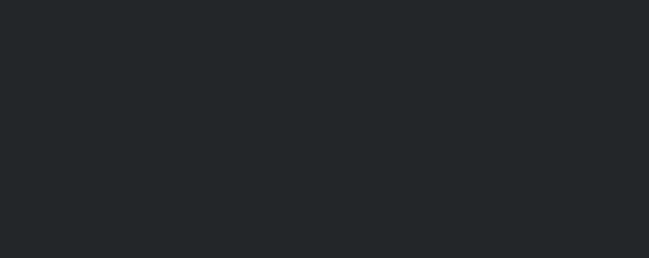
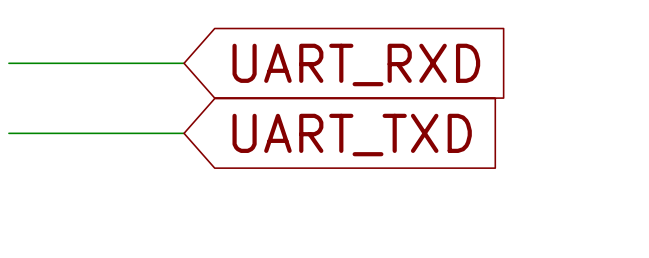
wire: none -> (8, 63) (184, 63)
global label: none -> UART_RXD (356, 64)
wire: none -> (8, 133) (184, 133)
global label: none -> UART_TXD (352, 135)

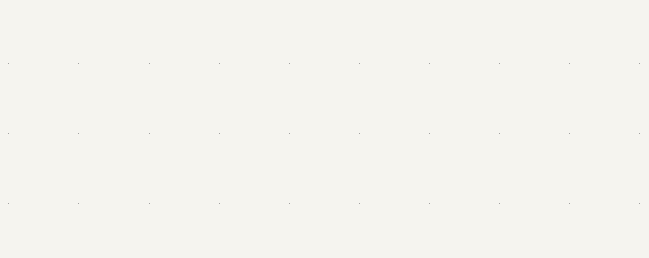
wire: (8, 63) (184, 63) -> none
global label: UART_RXD (356, 64) -> none
wire: (8, 133) (184, 133) -> none
global label: UART_TXD (352, 135) -> none

